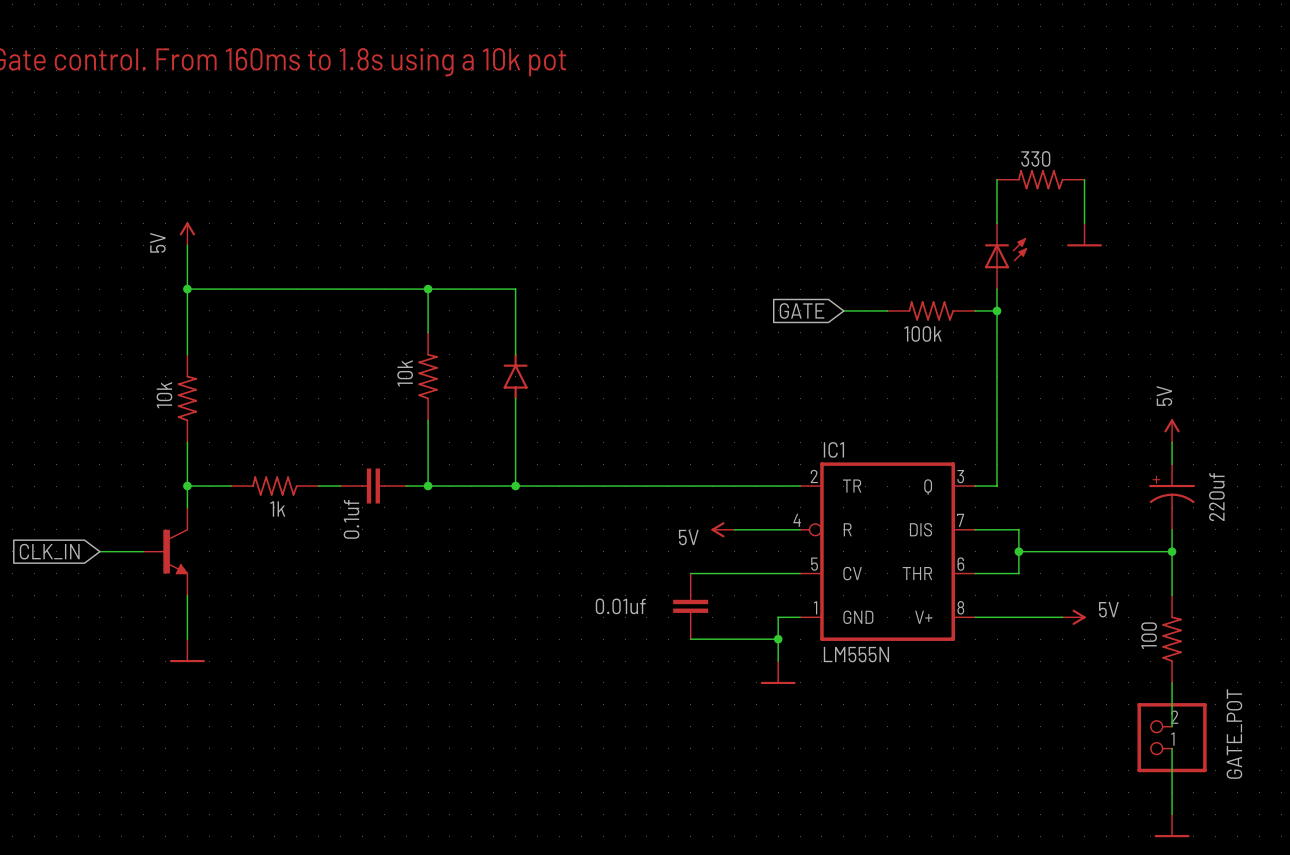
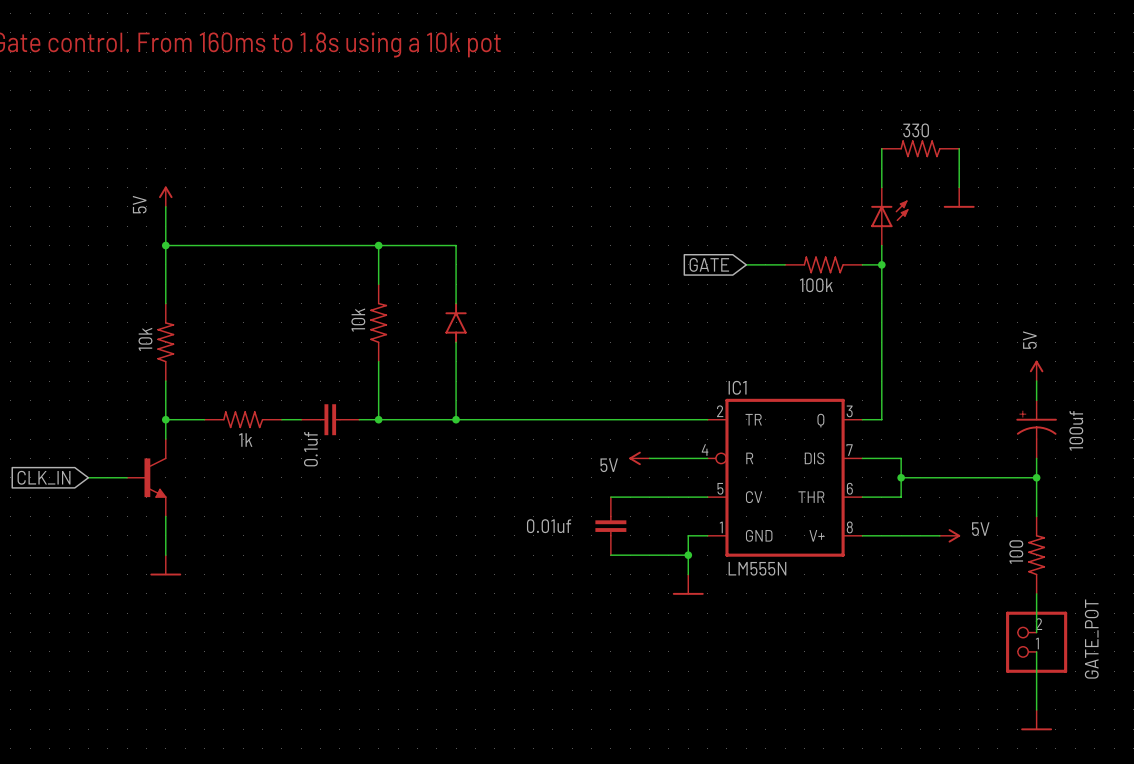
part value: 220uf (1216, 497) -> 100uf (1076, 430)

